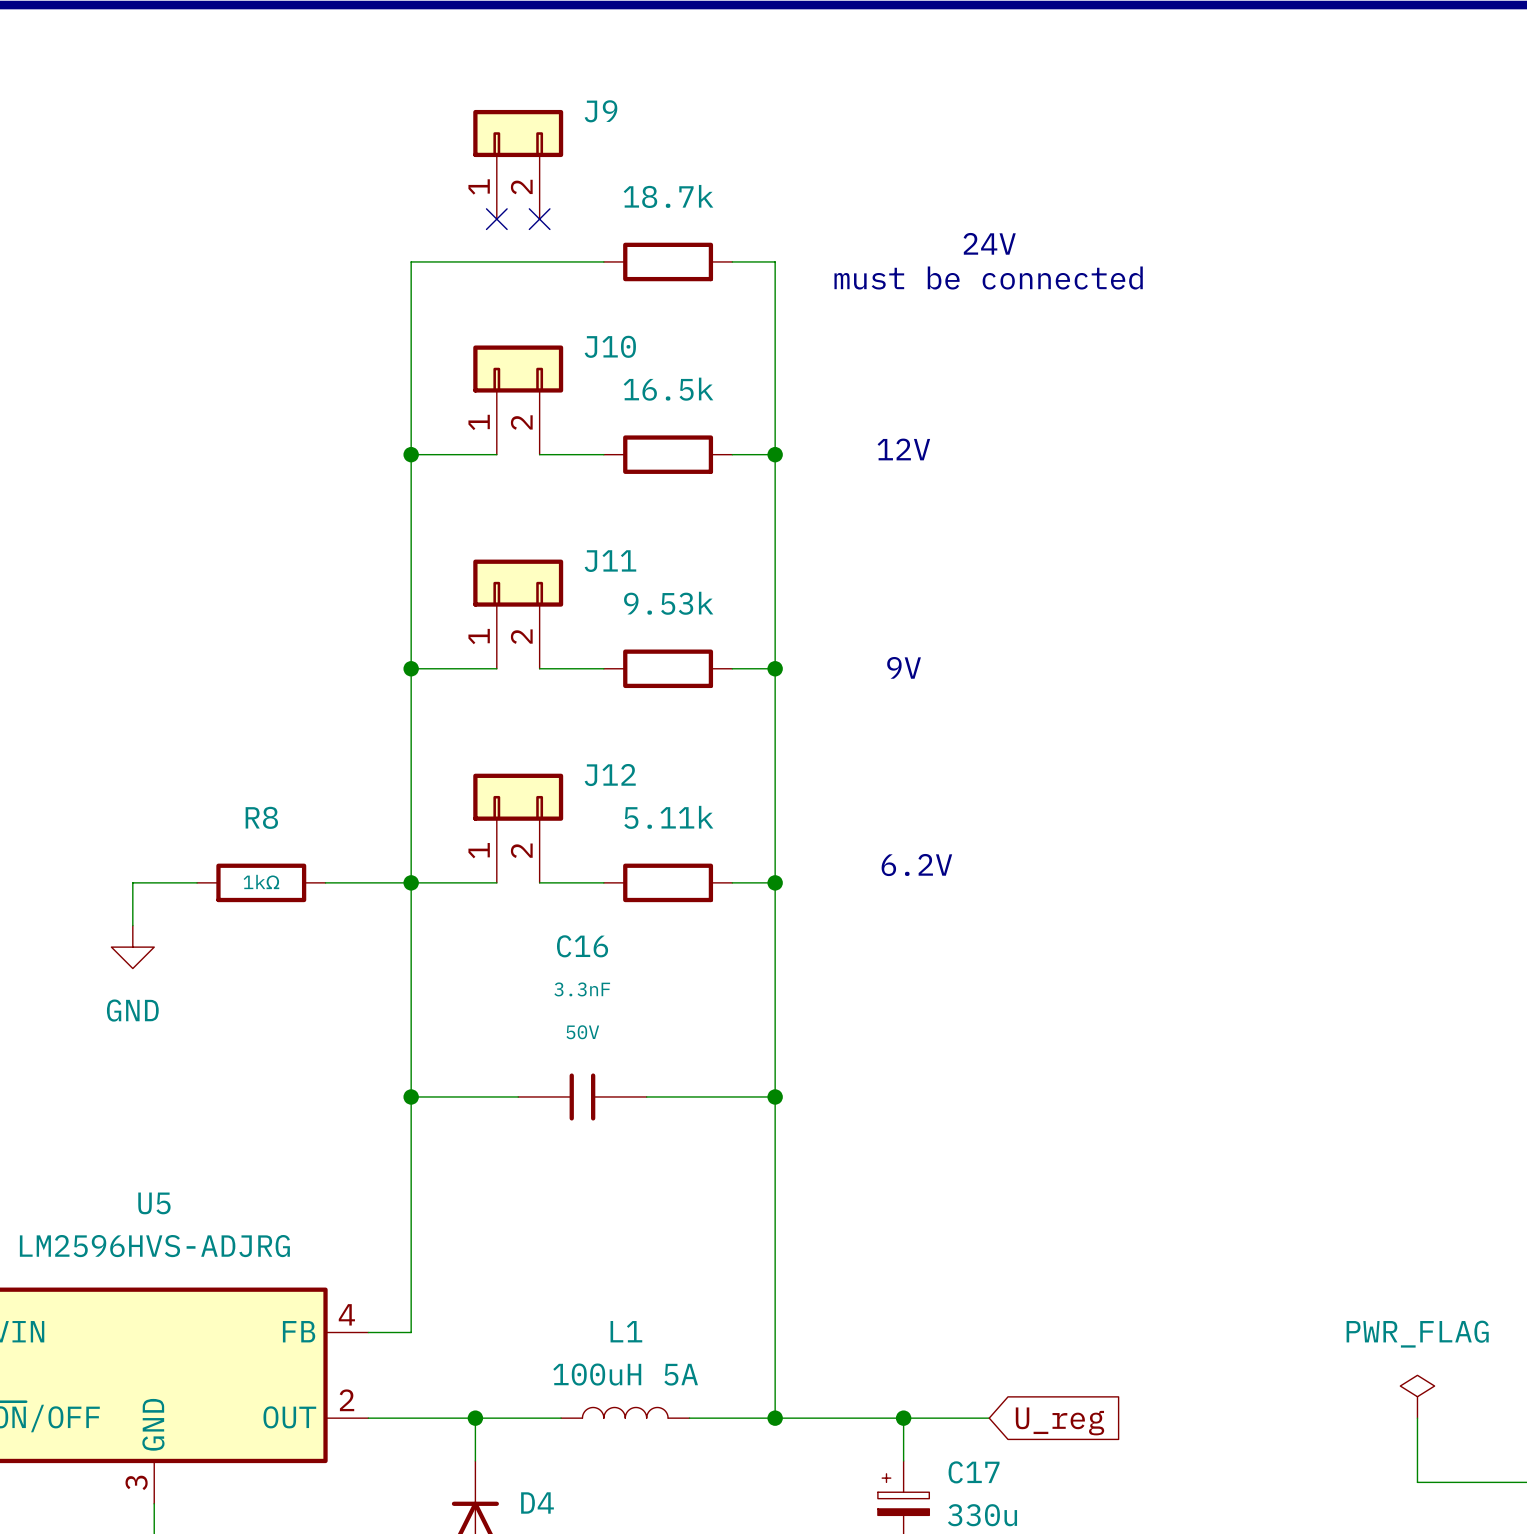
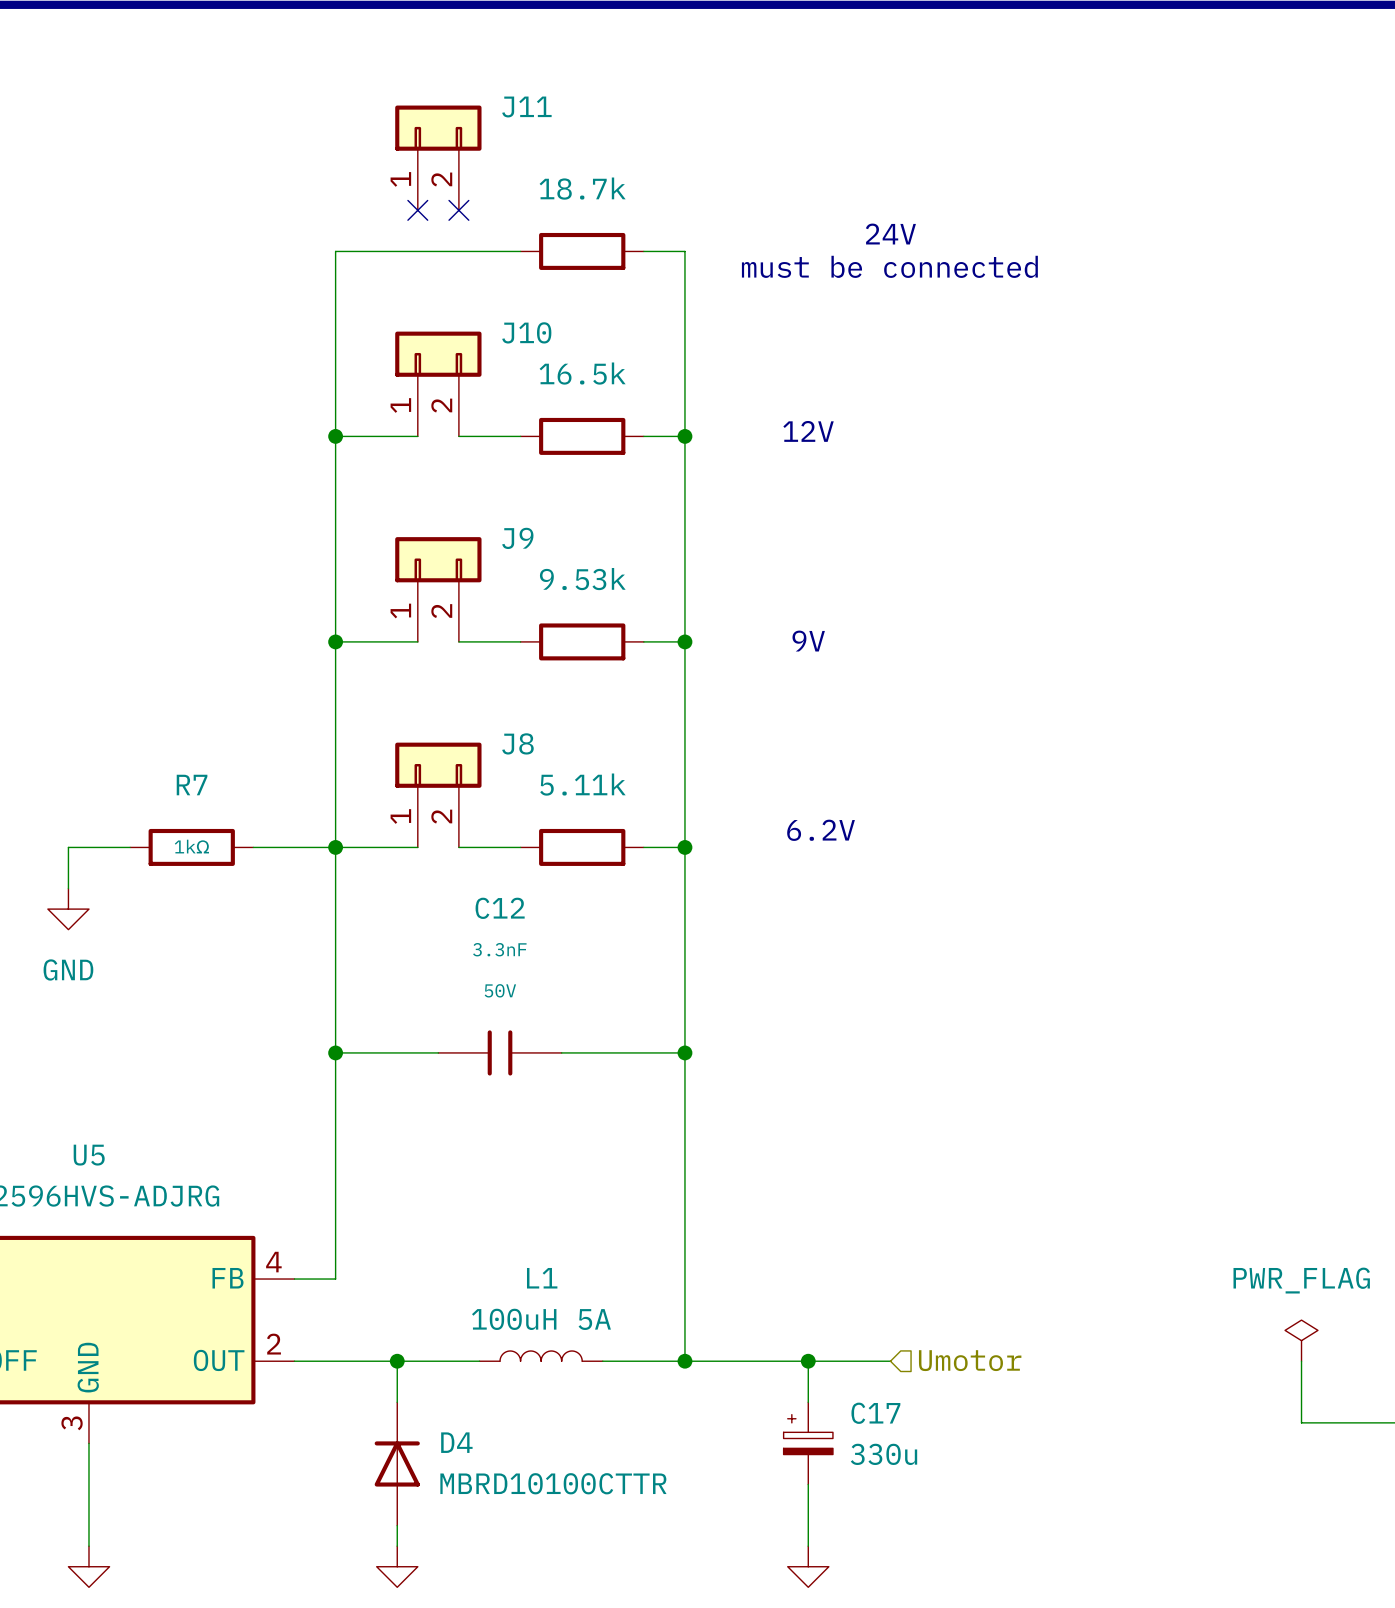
J9 name: J9 (601, 111) -> J11 (526, 107)
J11 name: J11 (610, 561) -> J9 (517, 538)
J12 name: J12 (610, 775) -> J8 (517, 743)
R8 name: R8 (261, 817) -> R7 (192, 785)
C16 name: C16 (582, 946) -> C12 (500, 908)
hierarchical label: none -> Umotor (970, 1360)
global label: U_reg (1059, 1421) -> none

